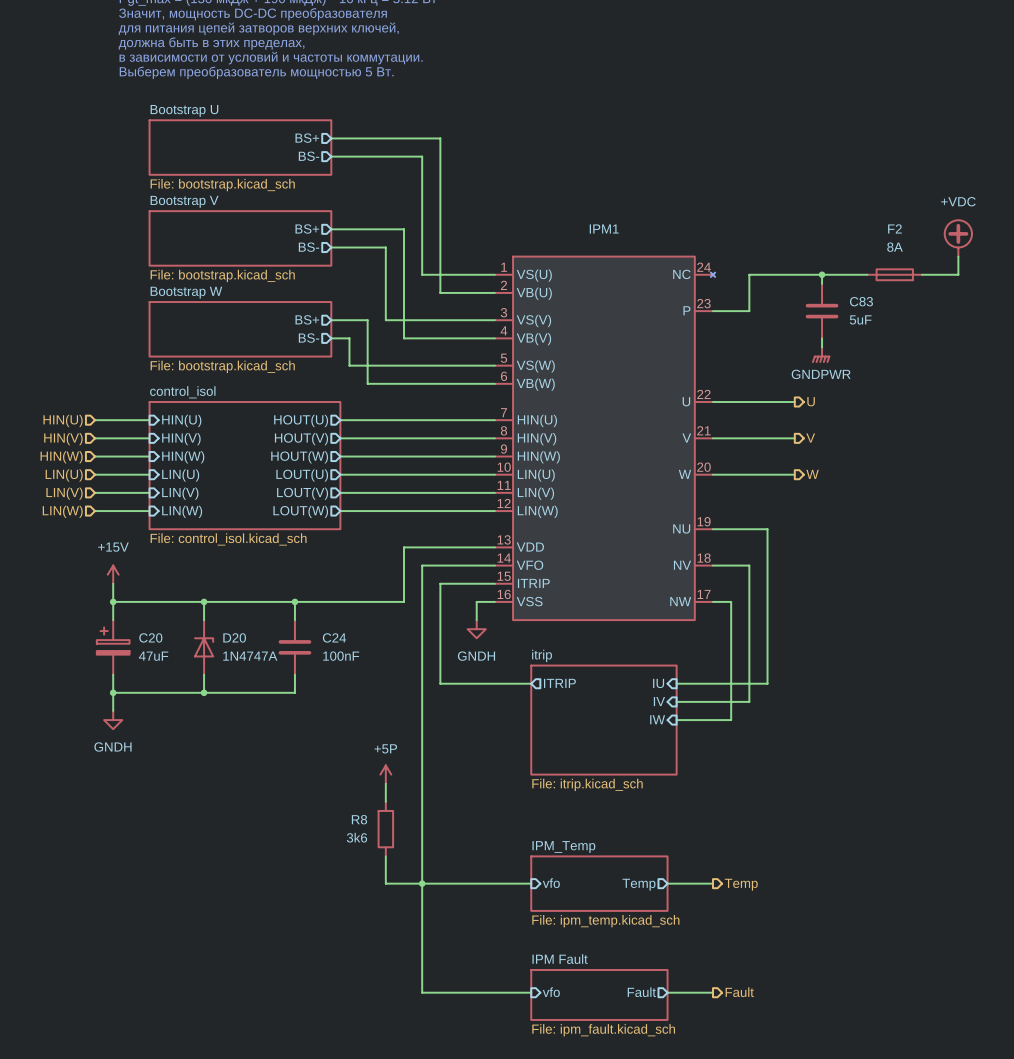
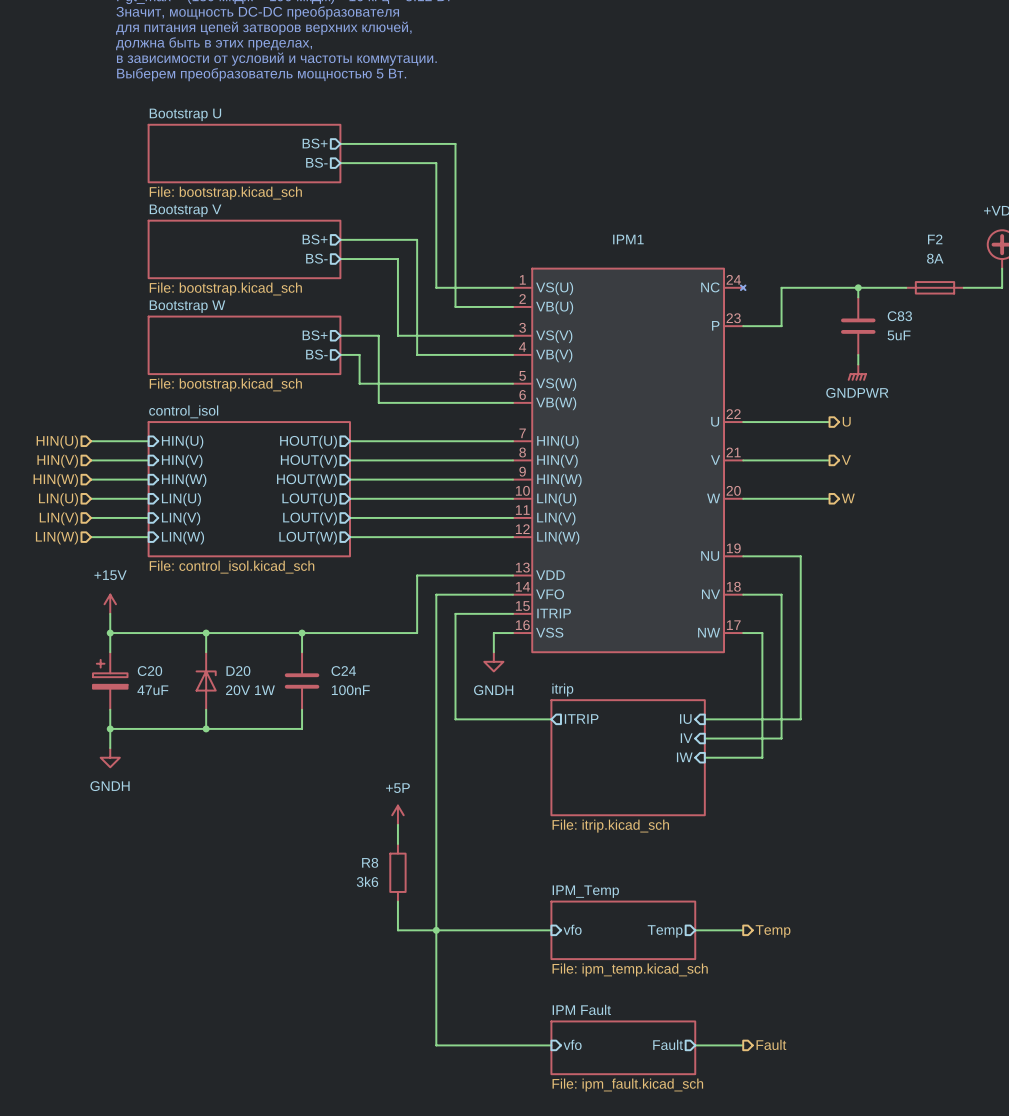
D20 value: 1N4747A (250, 656) -> 20V 1W (250, 690)

